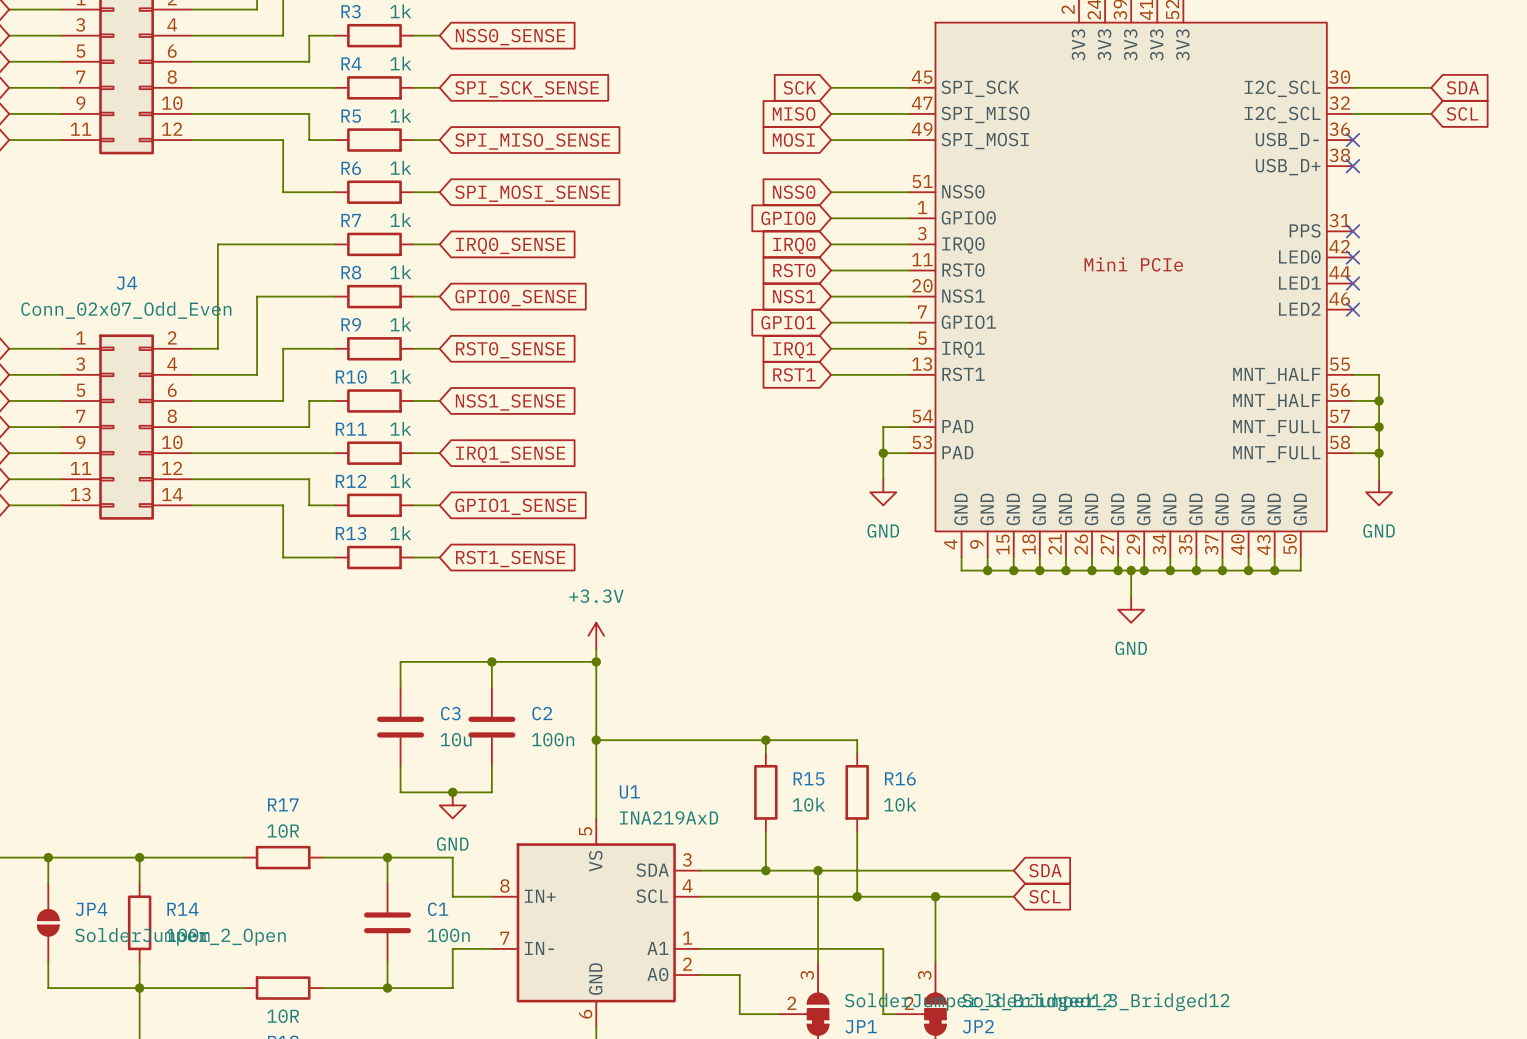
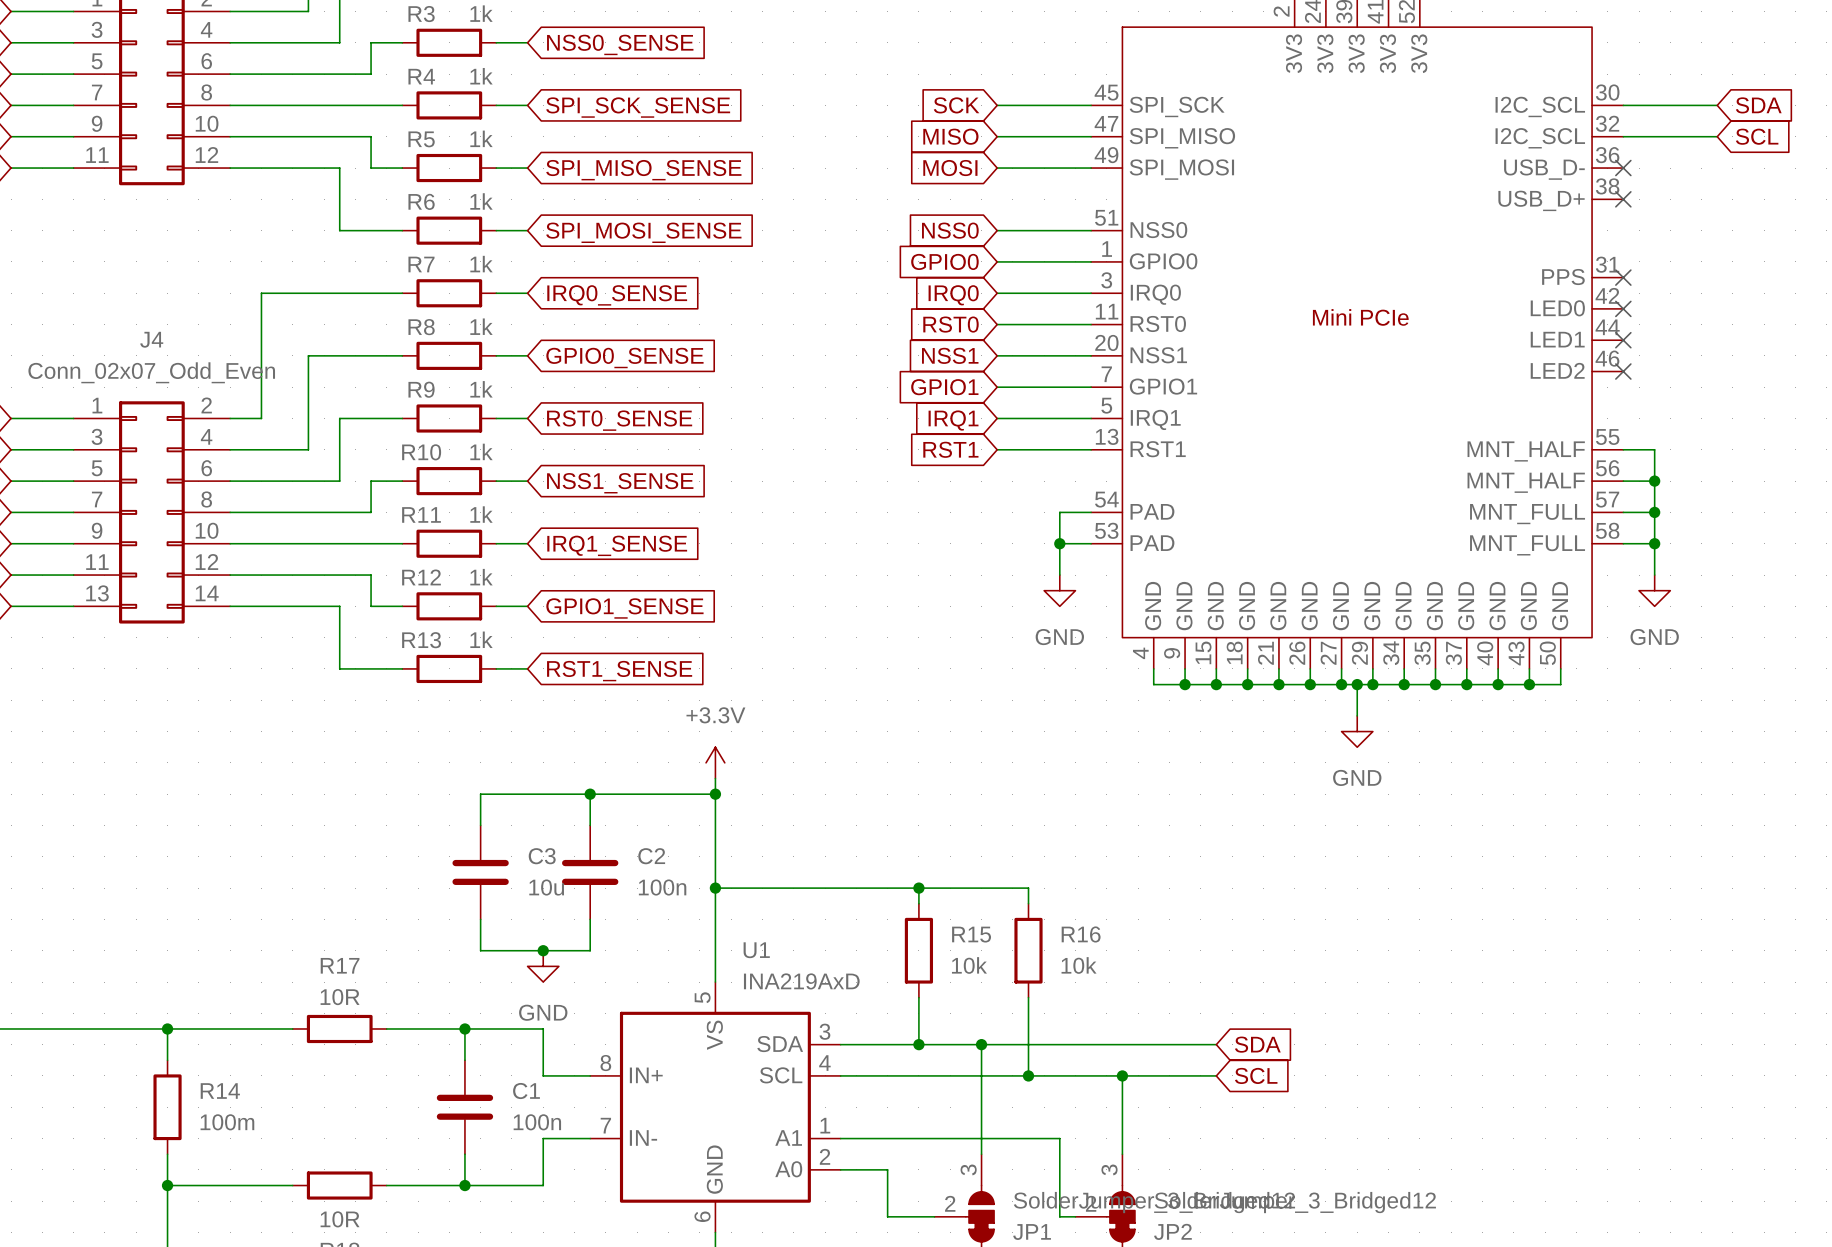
wire: (48, 857) (48, 883) -> none
junction: (48, 857) -> none
JP4: SolderJumper_2_Open (48, 922) -> none
wire: (48, 961) (48, 988) (139, 988) -> none

